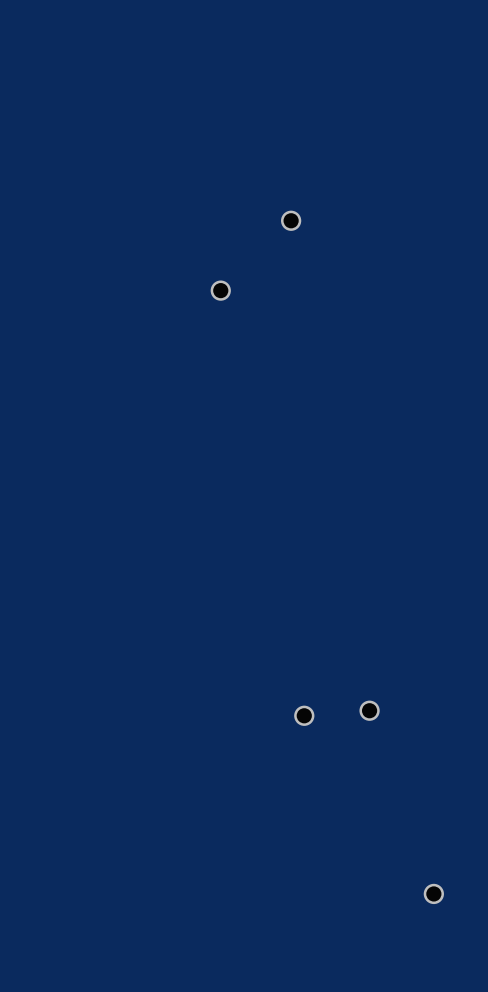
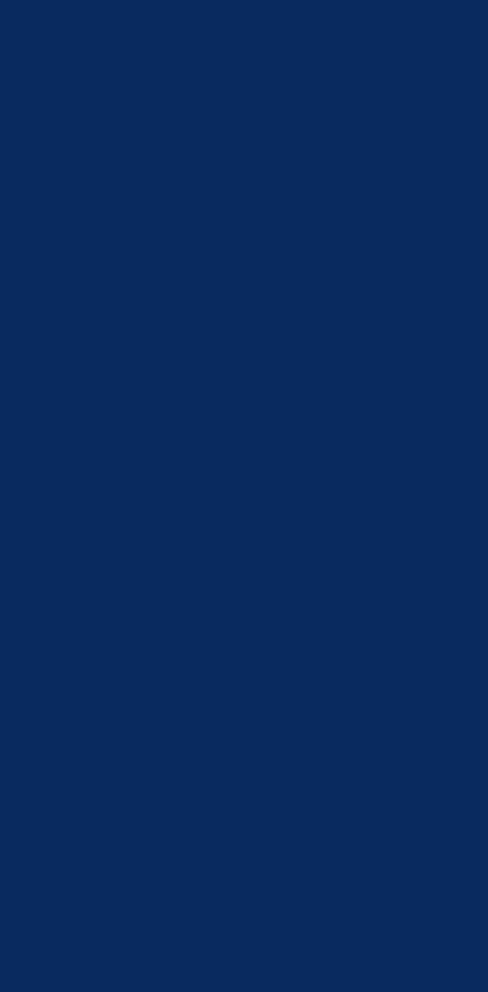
via: (291, 220) -> none
via: (220, 290) -> none
via: (369, 710) -> none
via: (304, 715) -> none
via: (433, 893) -> none

